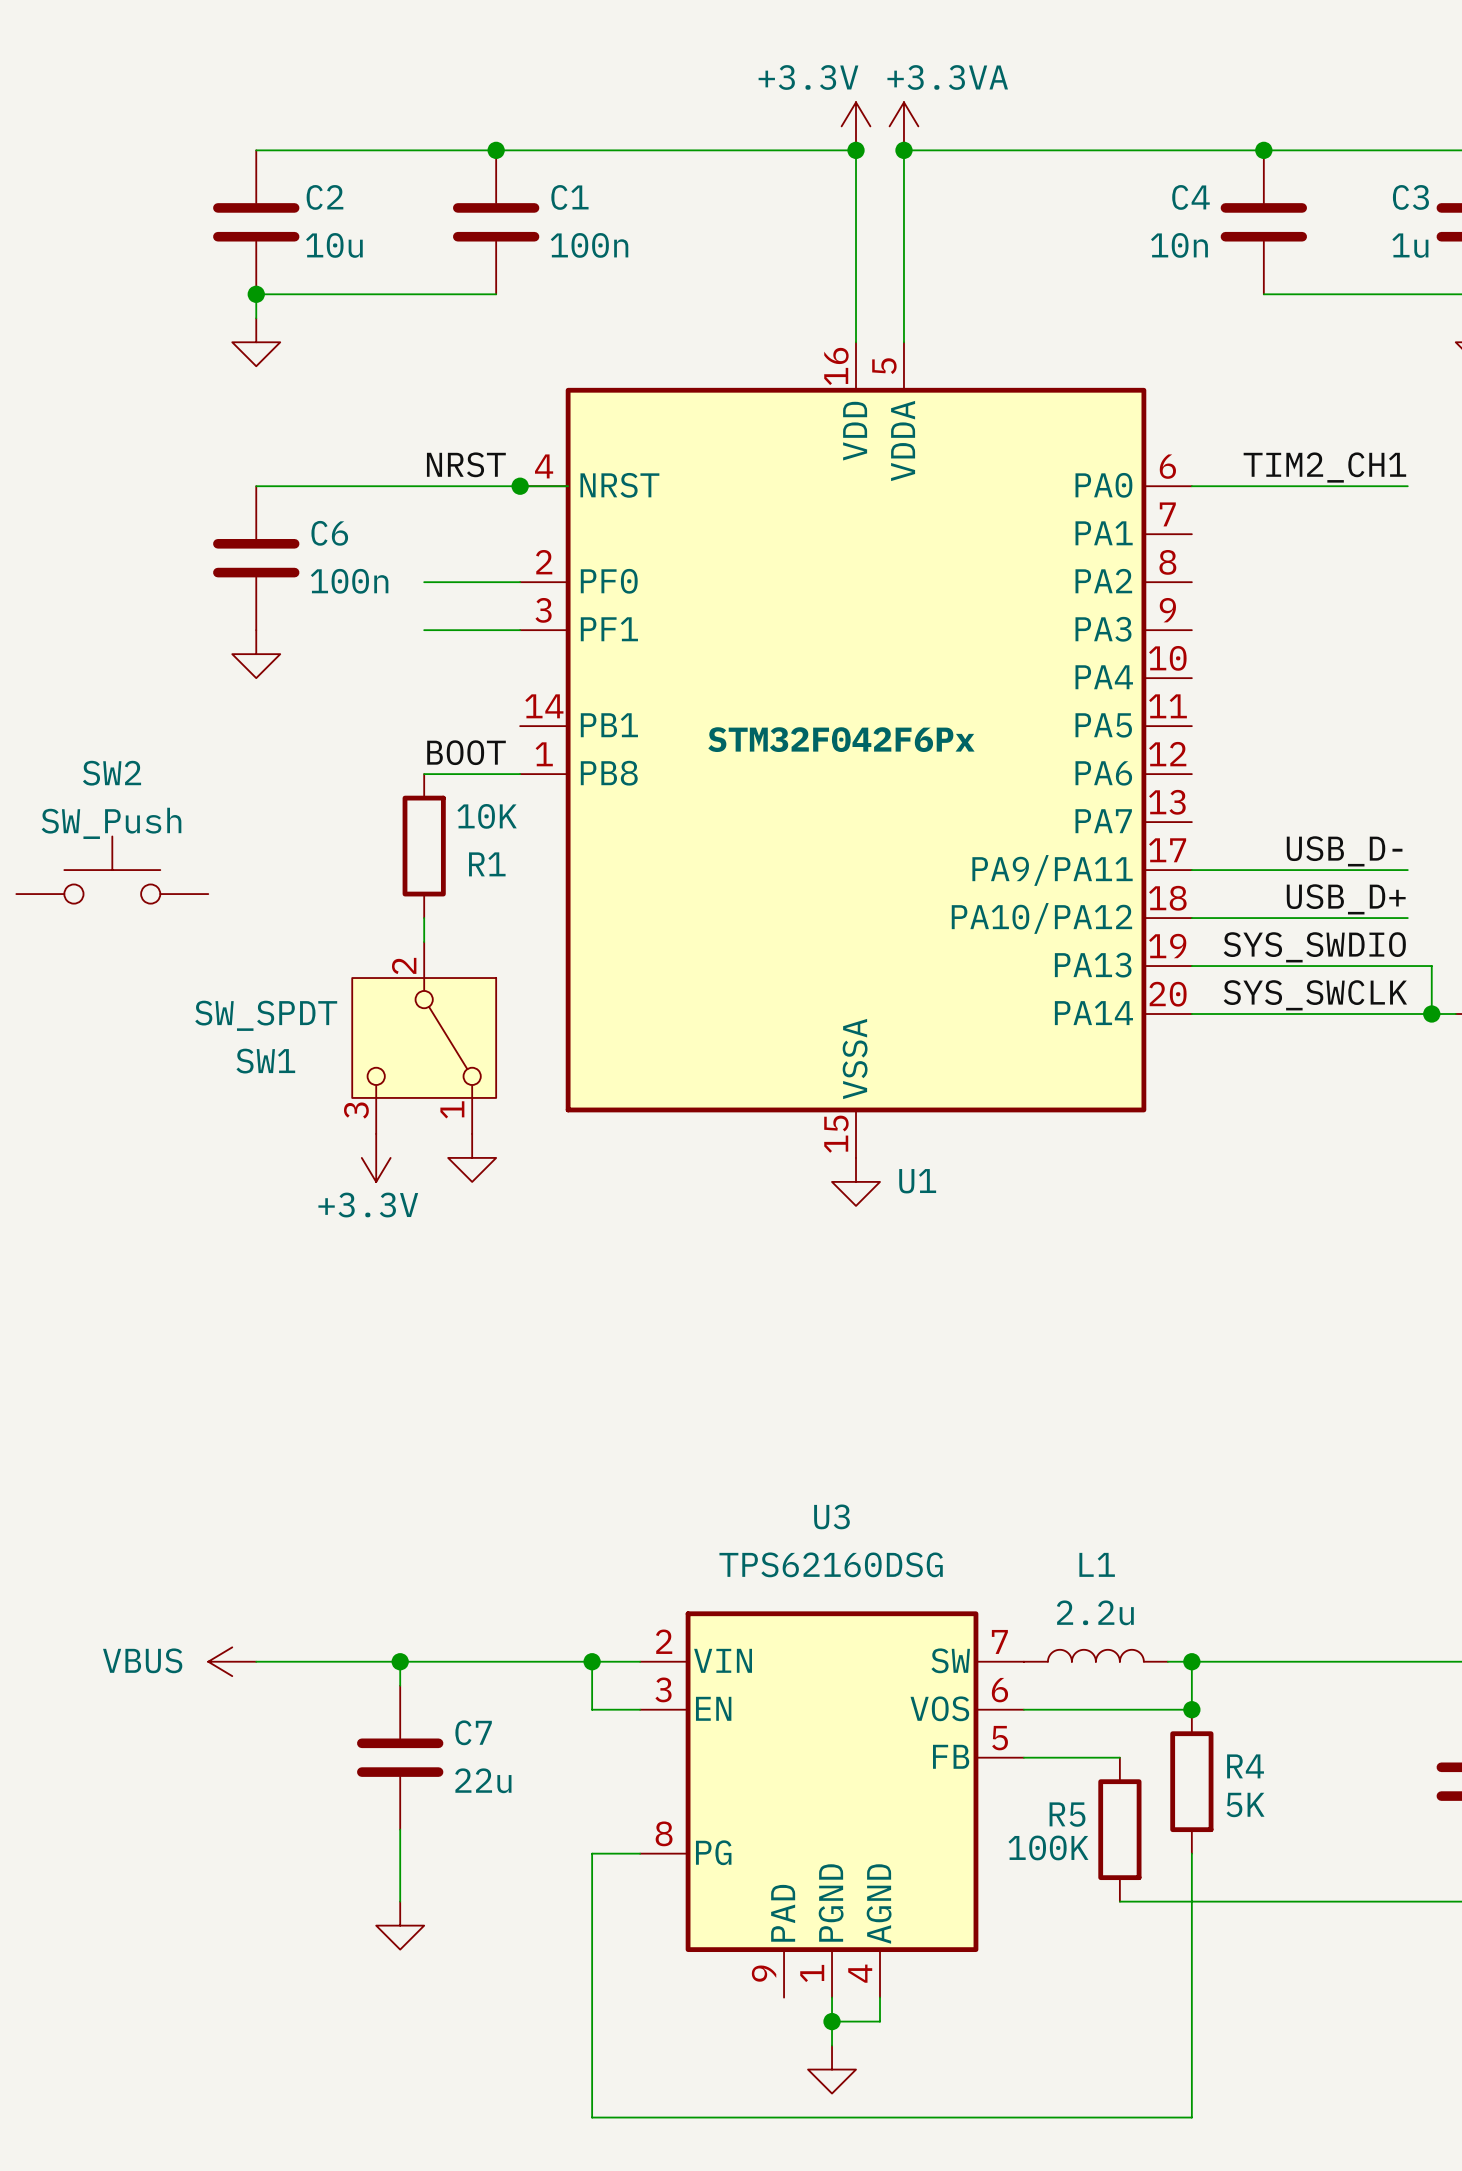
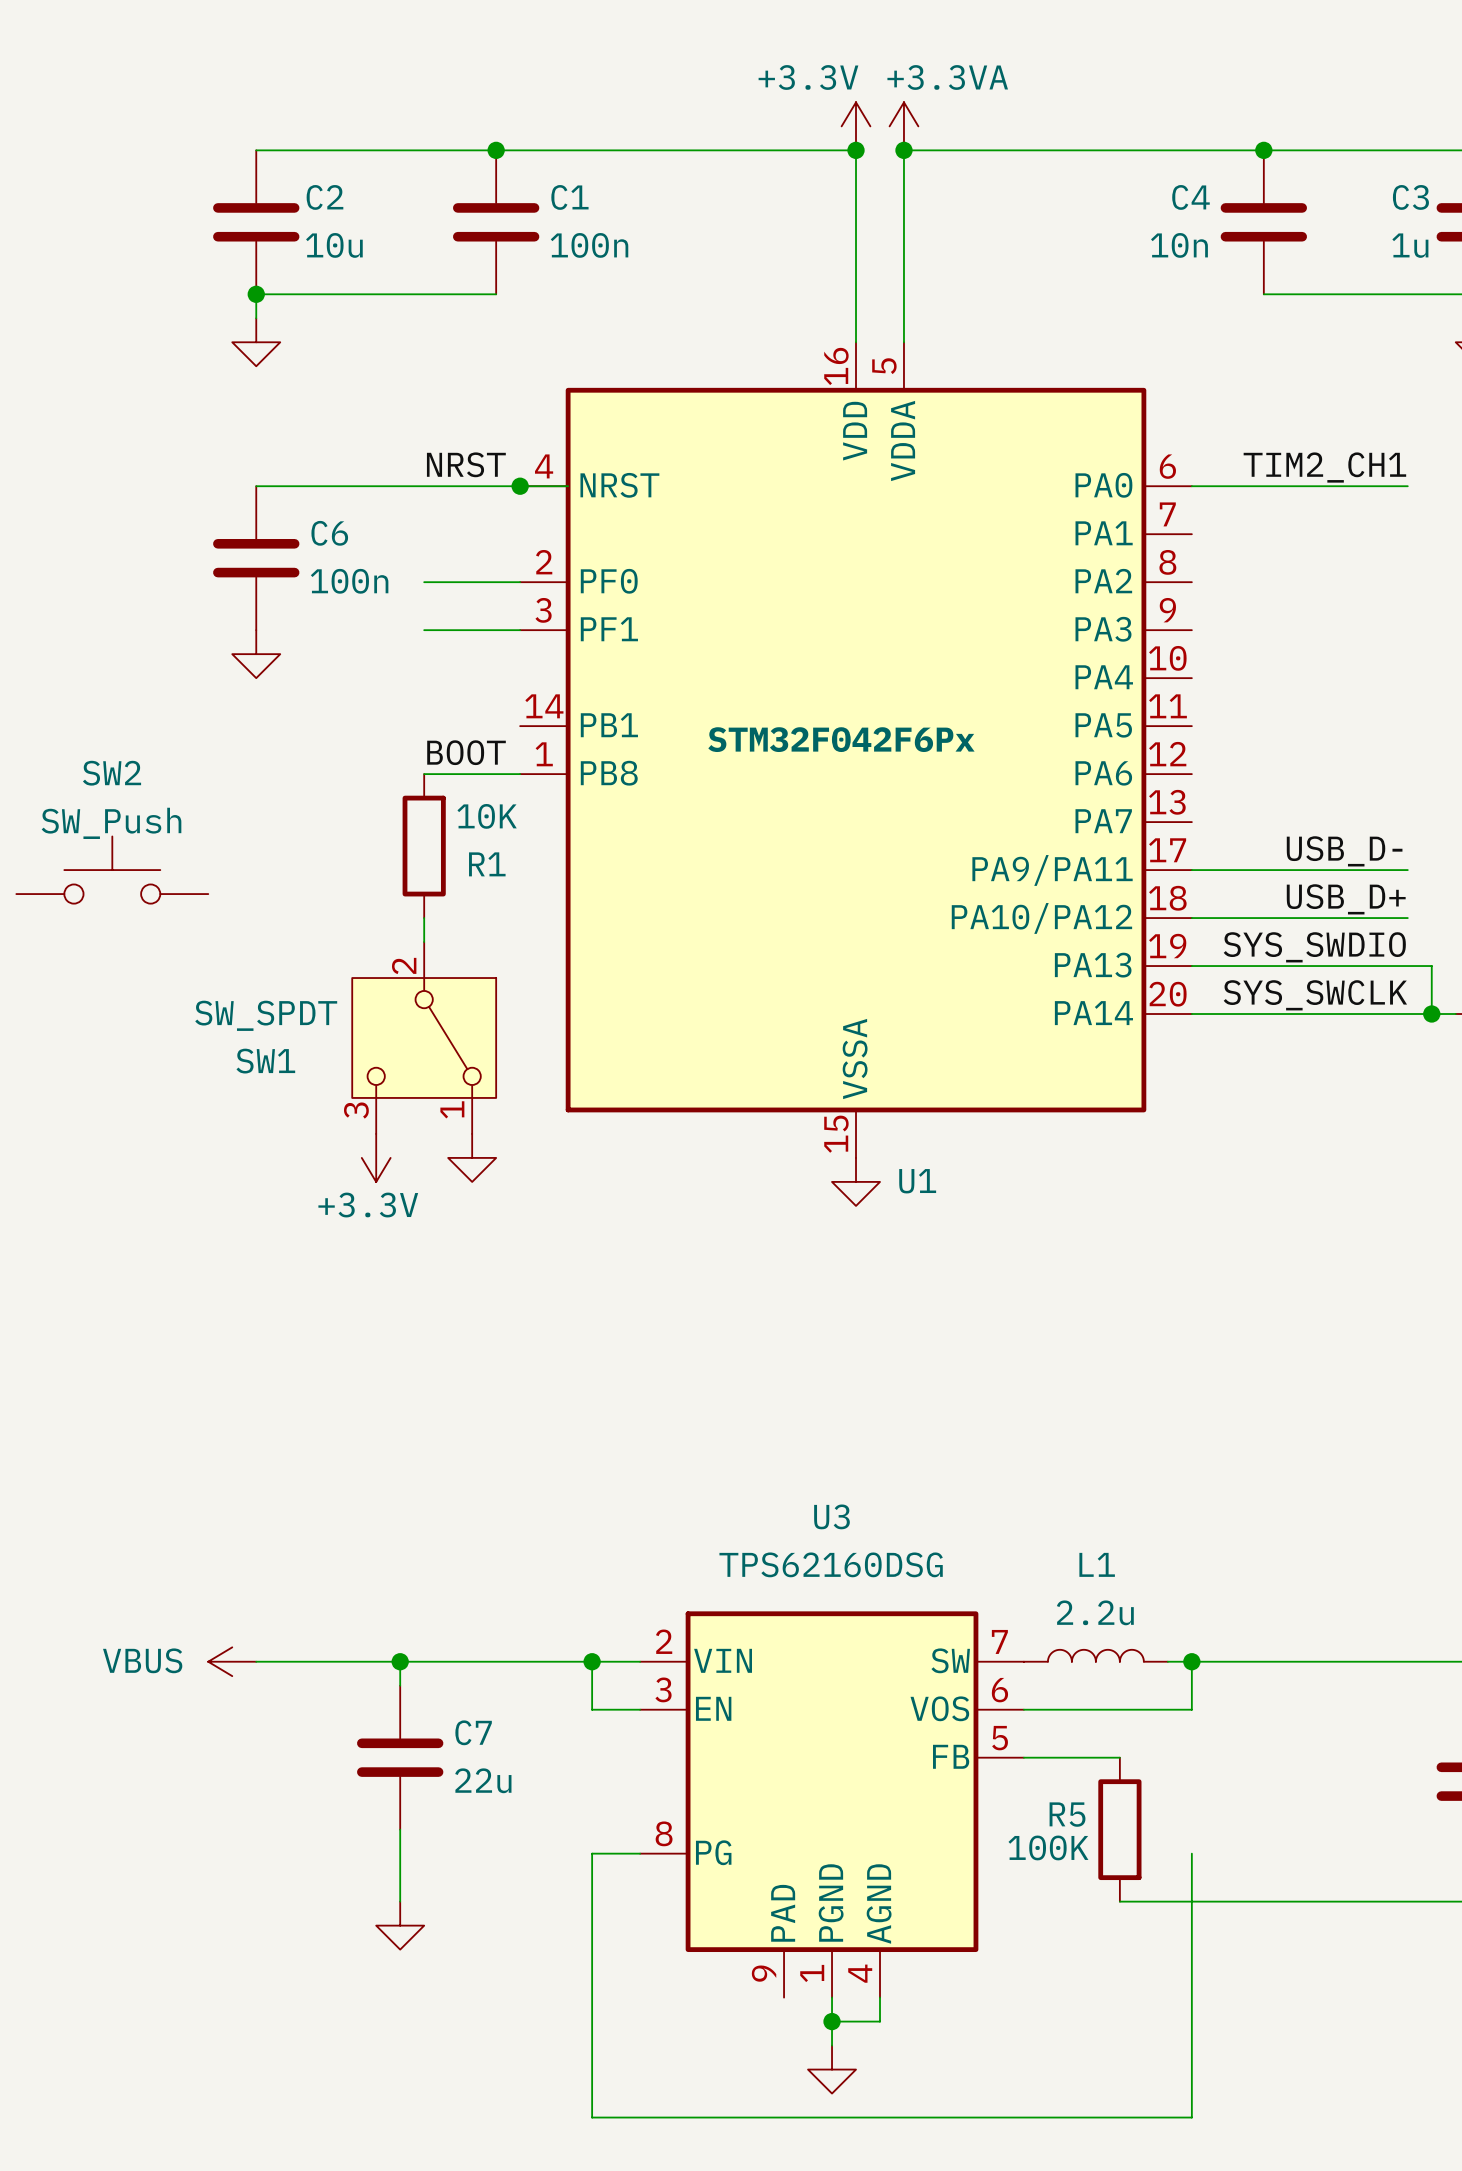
junction: (1191, 1709) -> none
R4: 5K (1191, 1781) -> none

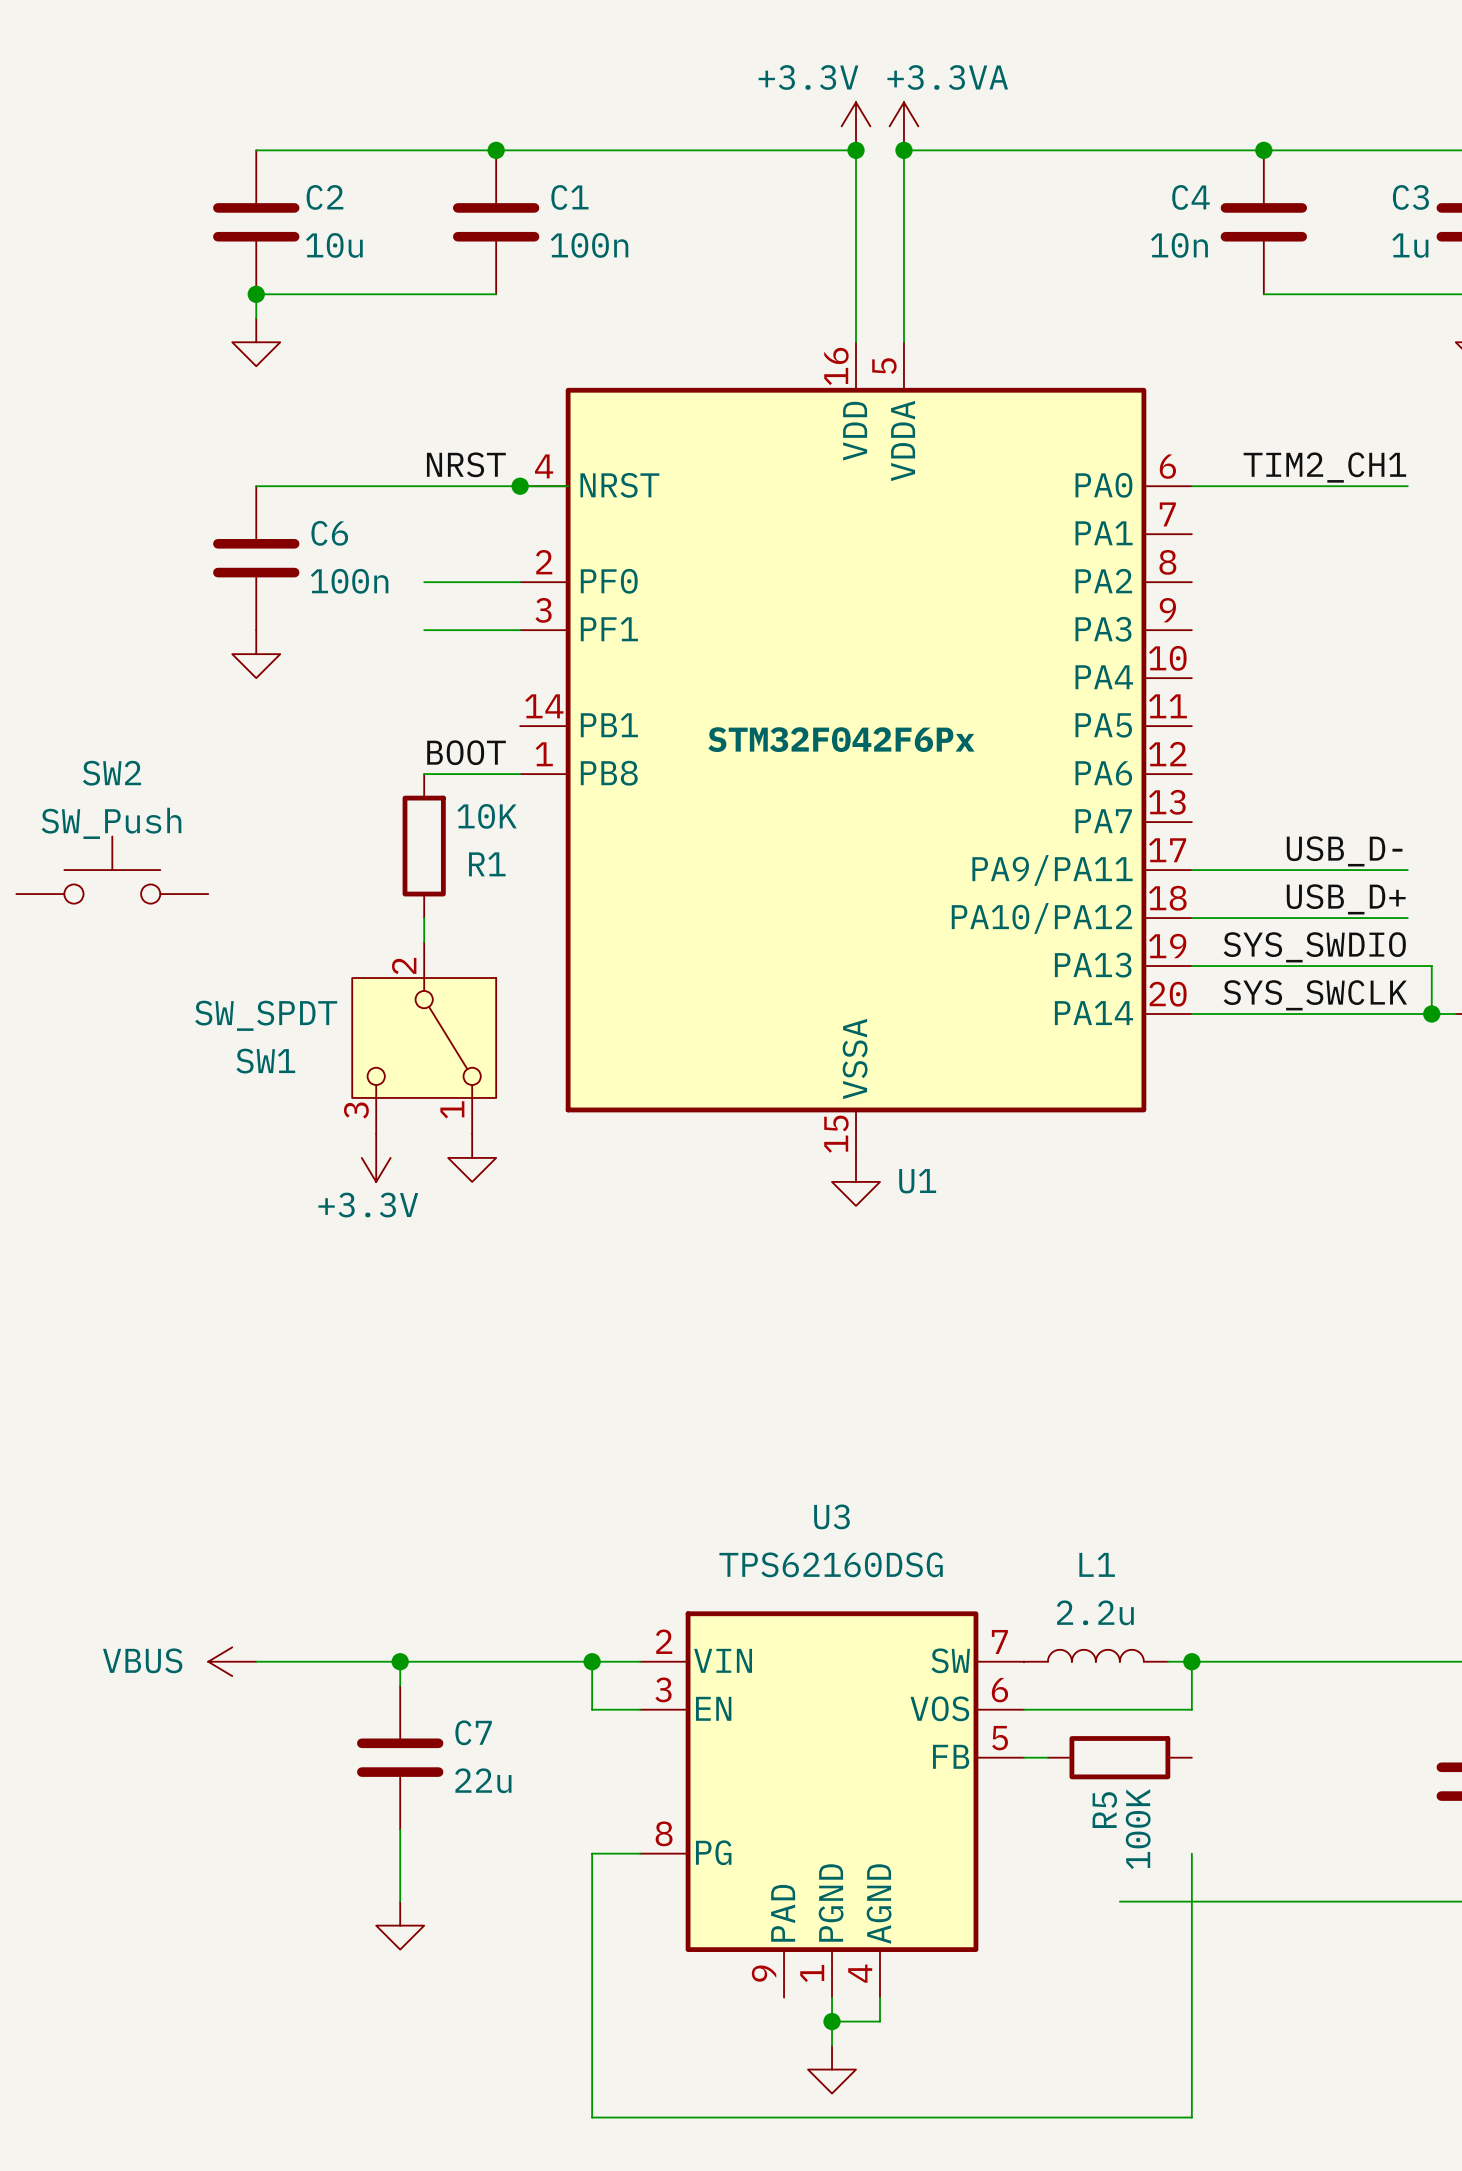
wire: (1047, 1757) (1119, 1757) -> none
R5 name position: R5 (1067, 1814) -> R5 (1104, 1810)
R5 rotation: 0° (1119, 1829) -> 90° clockwise (1119, 1757)
R5 value position: 100K (1048, 1847) -> 100K (1138, 1829)

